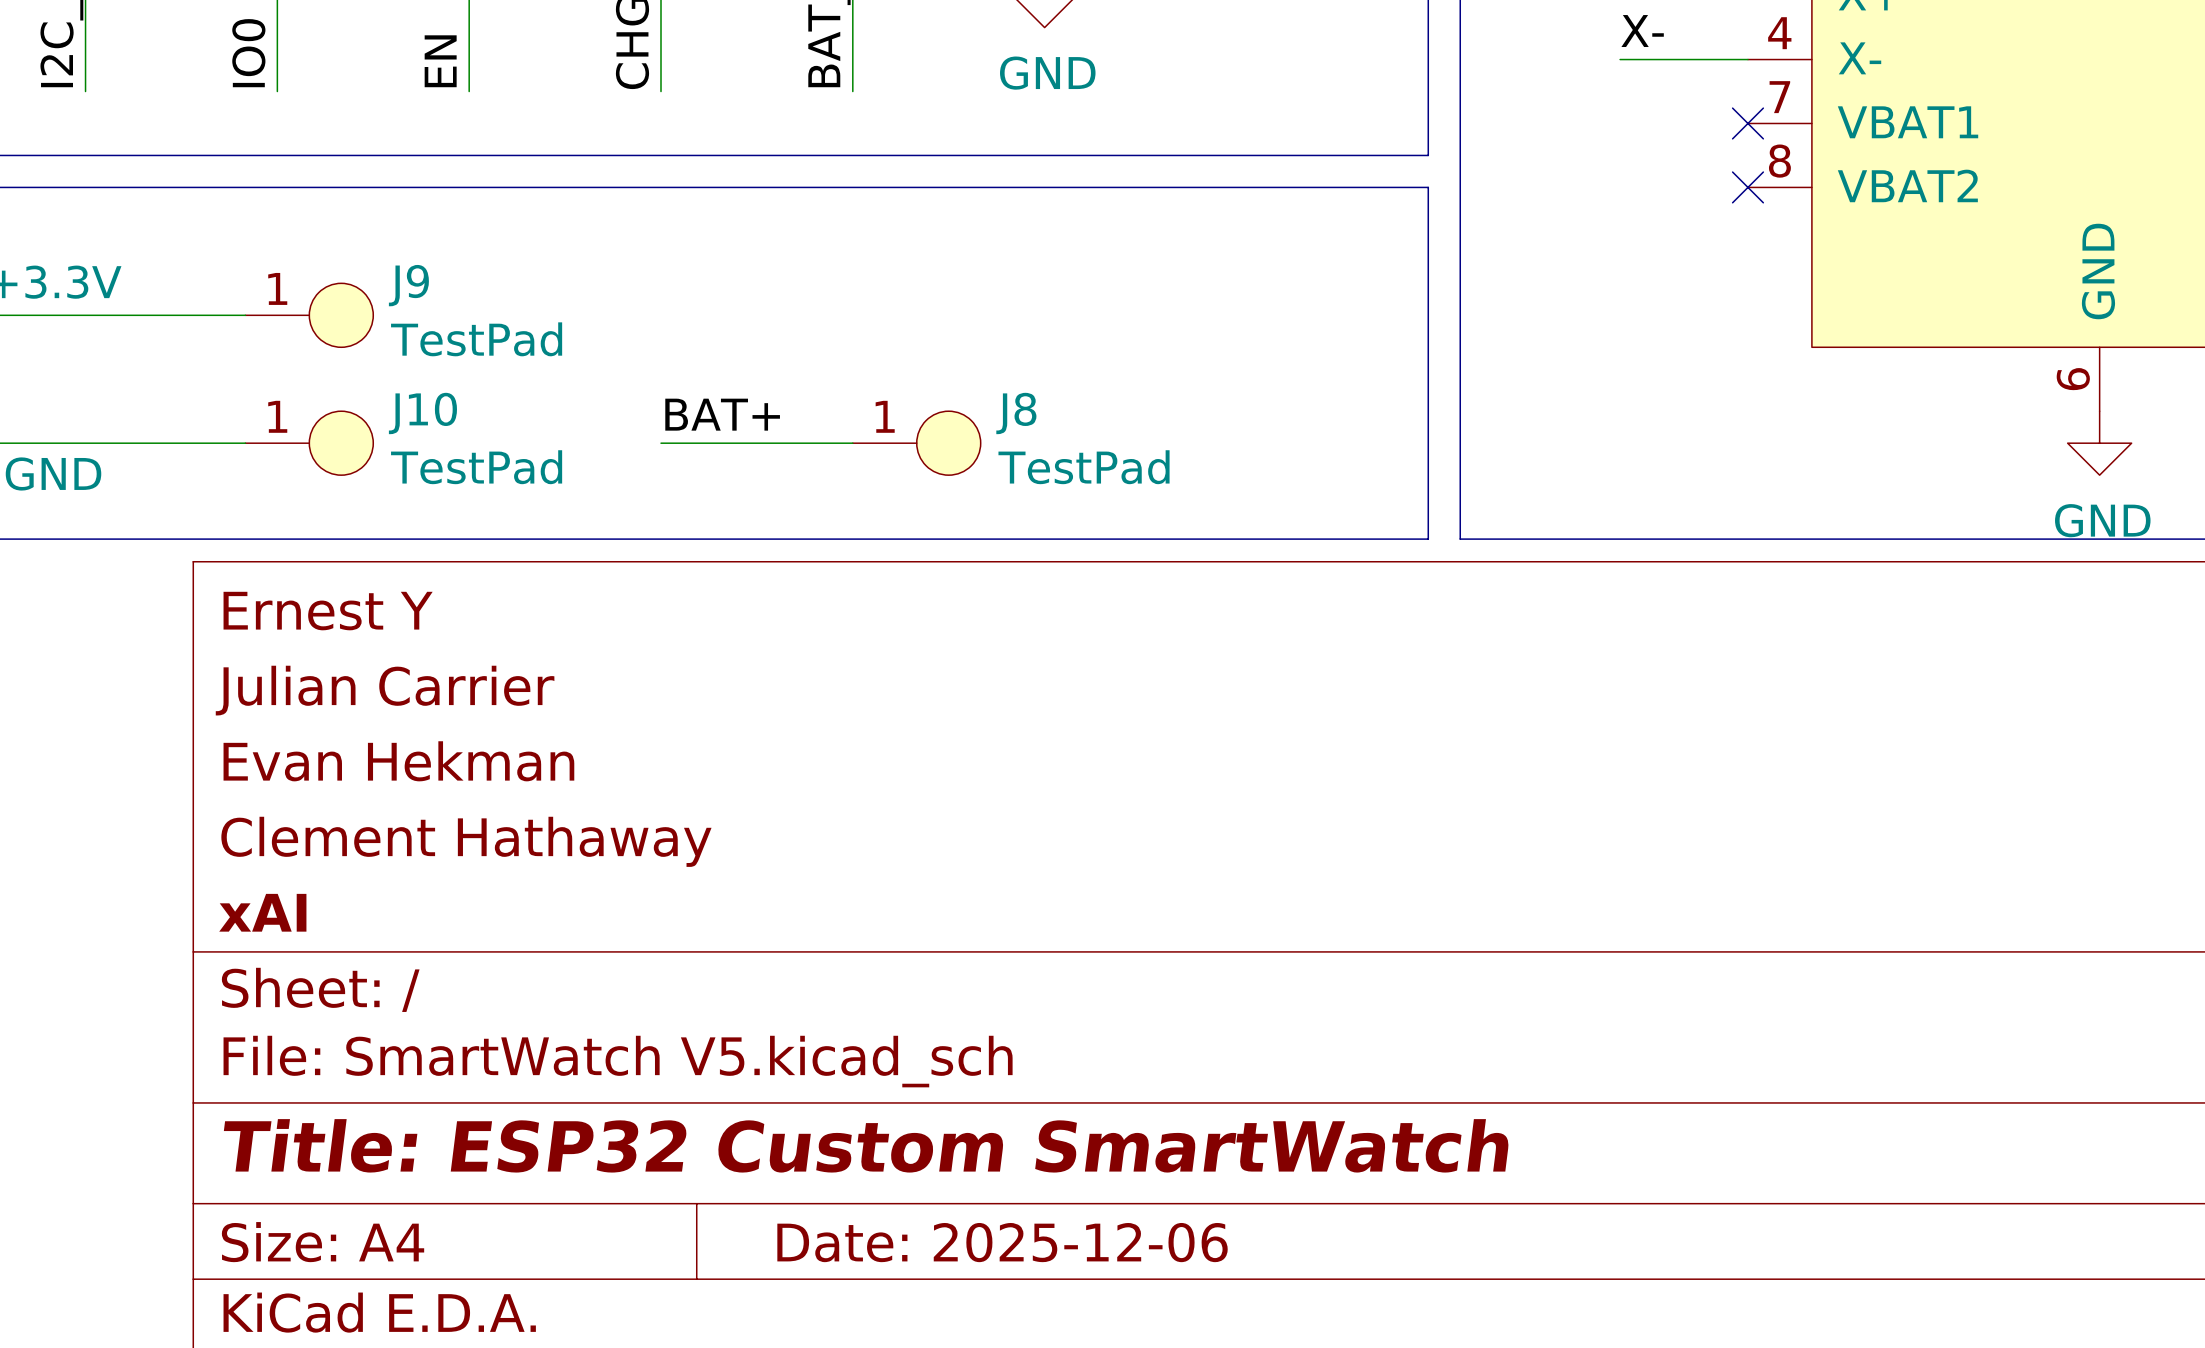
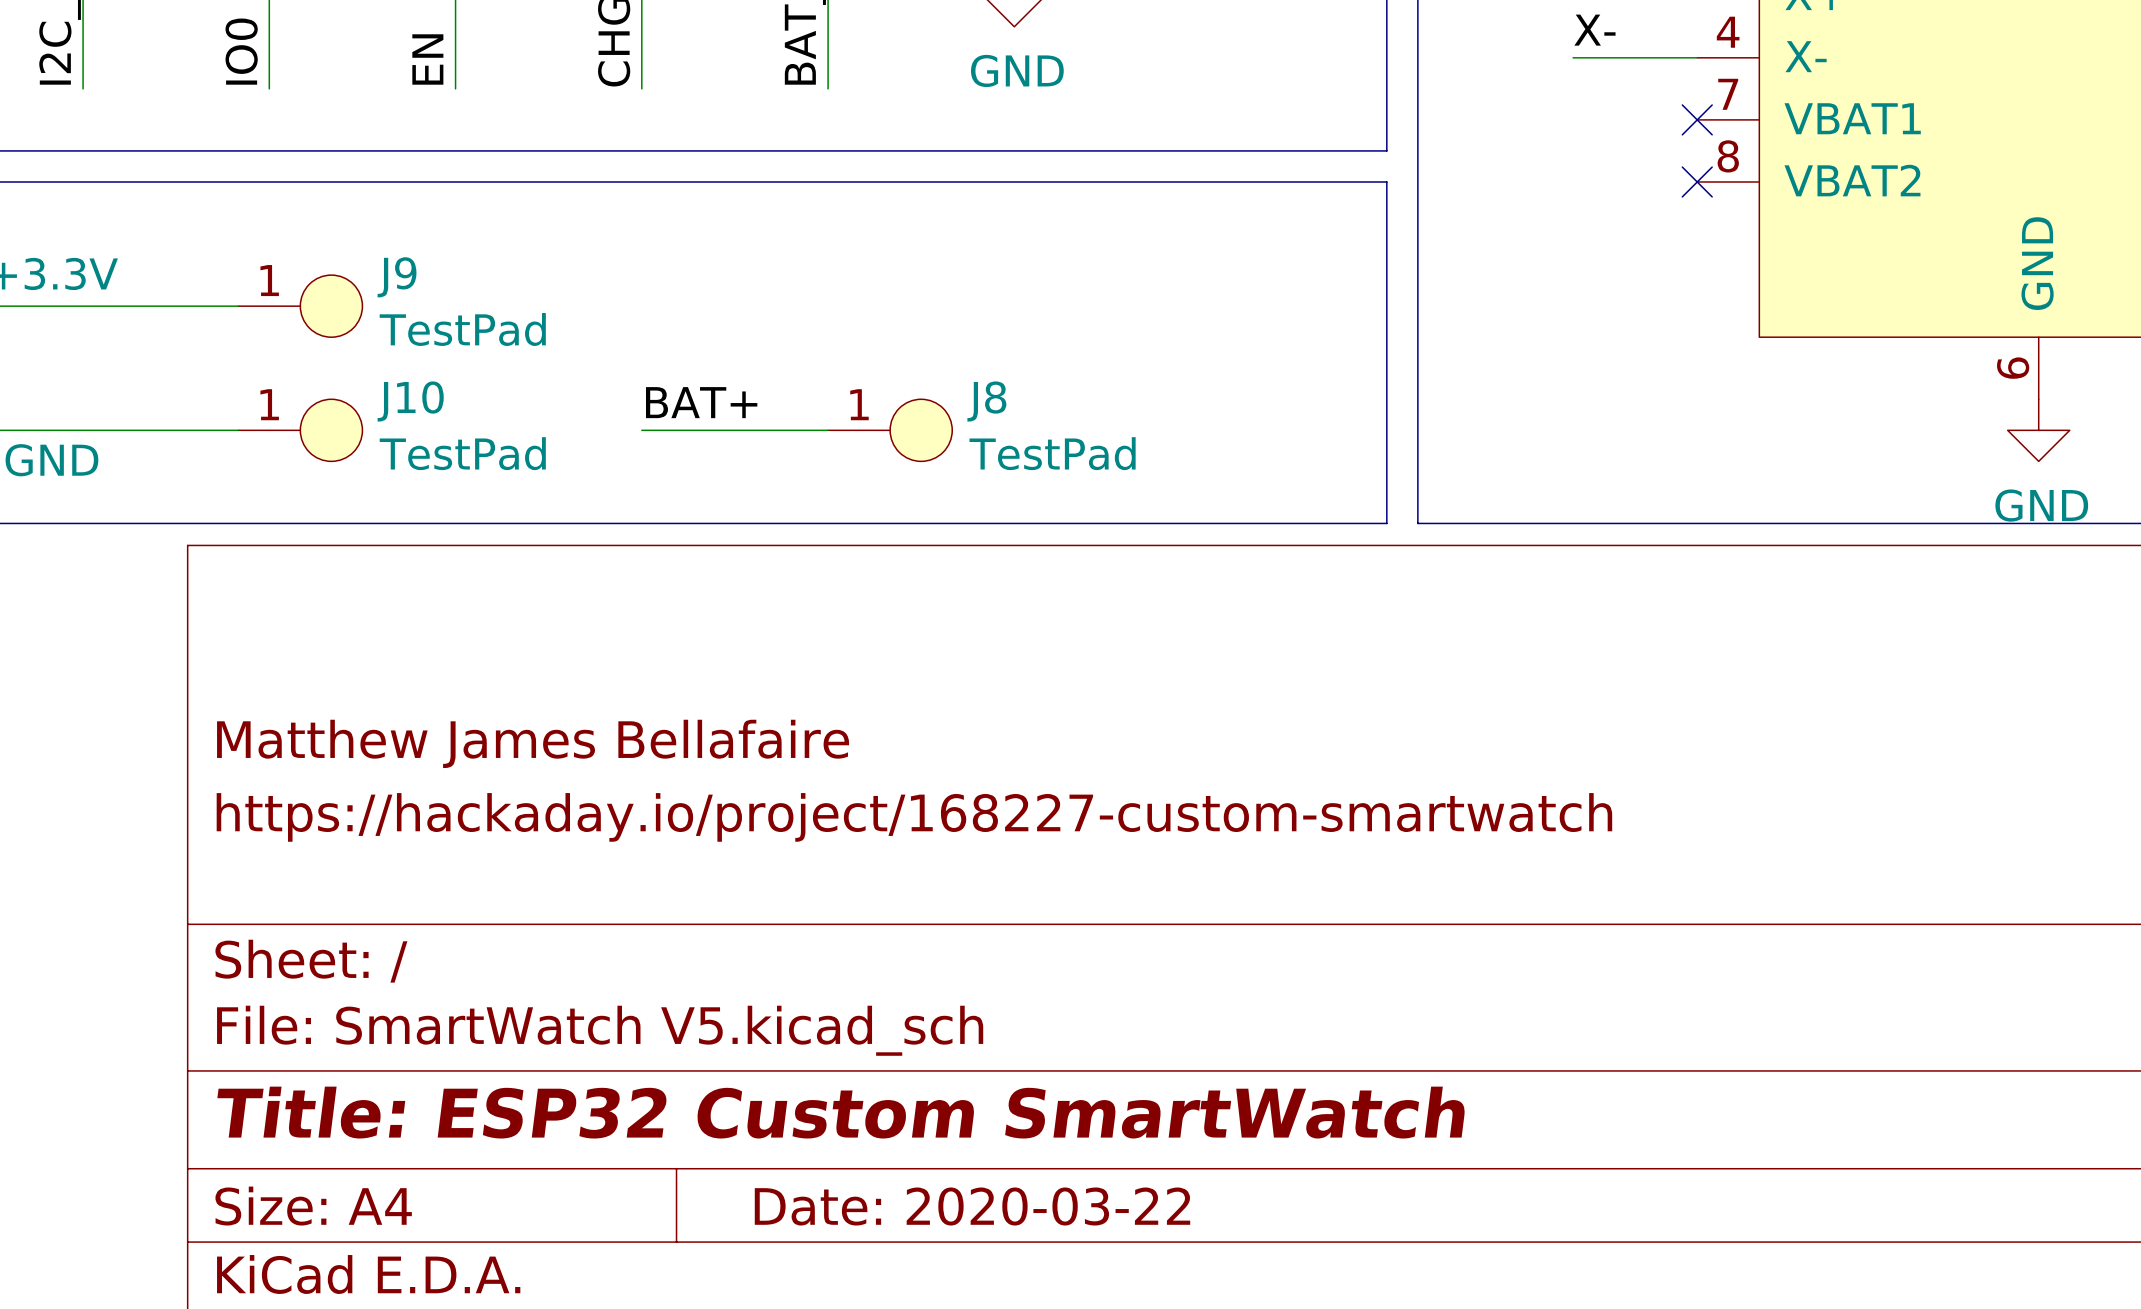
title block: Ernest Y (328, 611) -> none
title block: Julian Carrier (385, 690) -> none
title block: Evan Hekman (398, 761) -> Matthew James Bellafaire (533, 743)
title block: Clement Hathaway (466, 841) -> https://hackaday.io/project/168227-custom-smartwatch (914, 817)
title block: xAI (262, 912) -> none
title block: Date: 2025-12-06 (1002, 1242) -> Date: 2020-03-22 (972, 1206)

